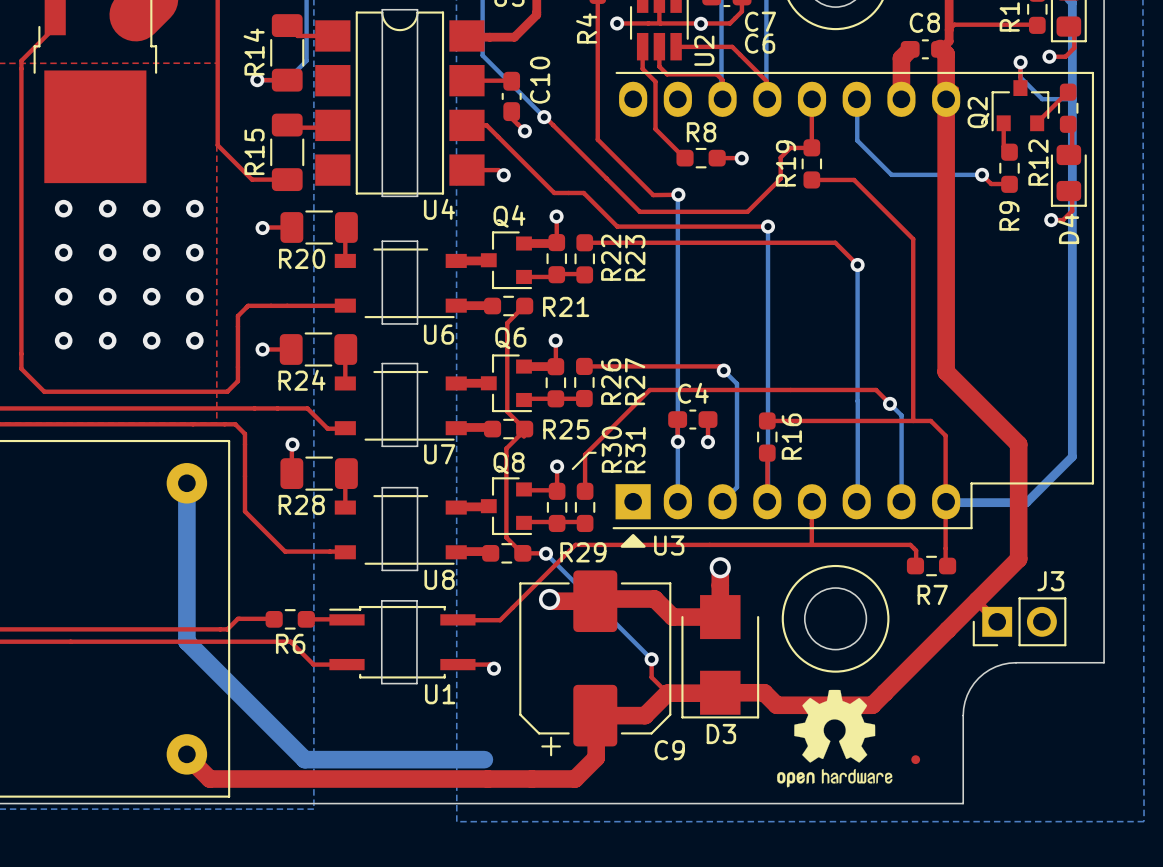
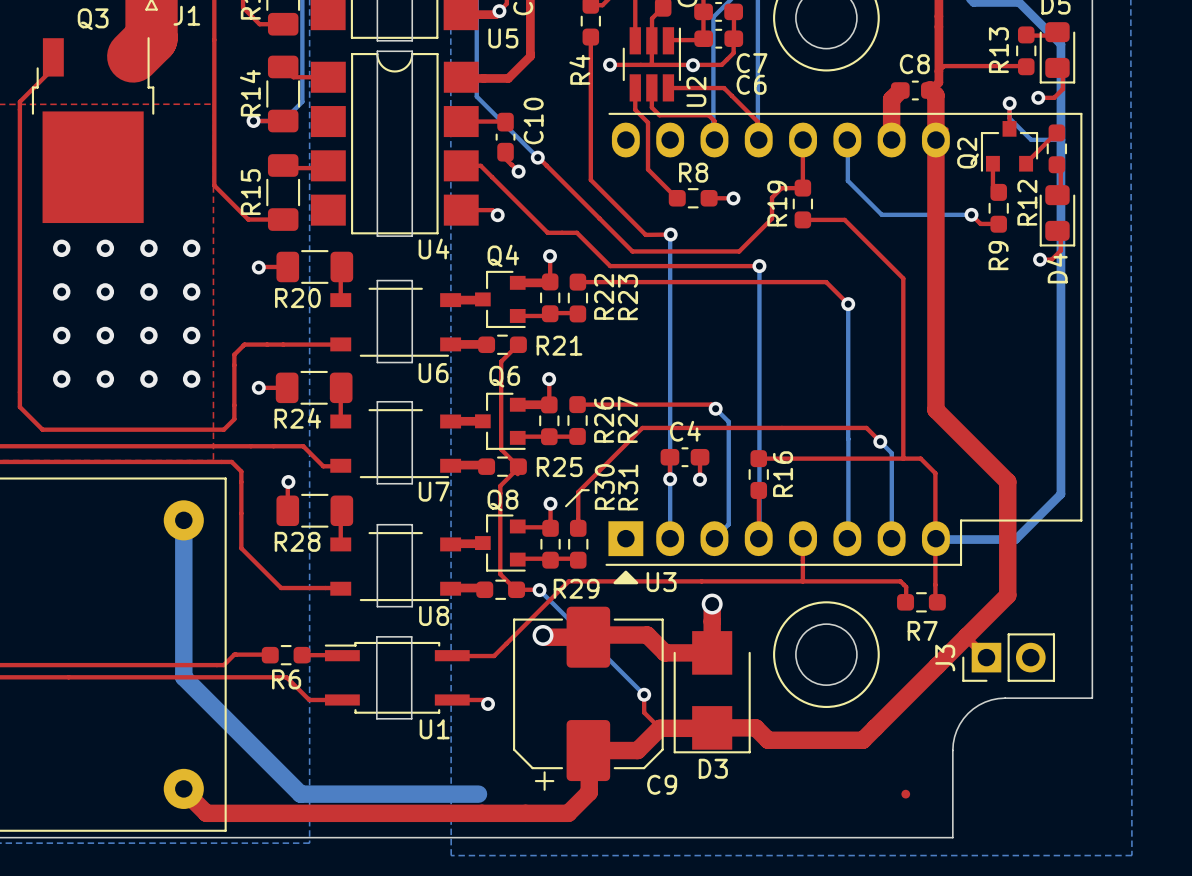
J3 name rotation: 0° (1050, 581) -> 90° counterclockwise (945, 658)
J3 name position: J3 (1050, 581) -> J3 (945, 658)
drawing: [777, 689, 893, 788] -> none

